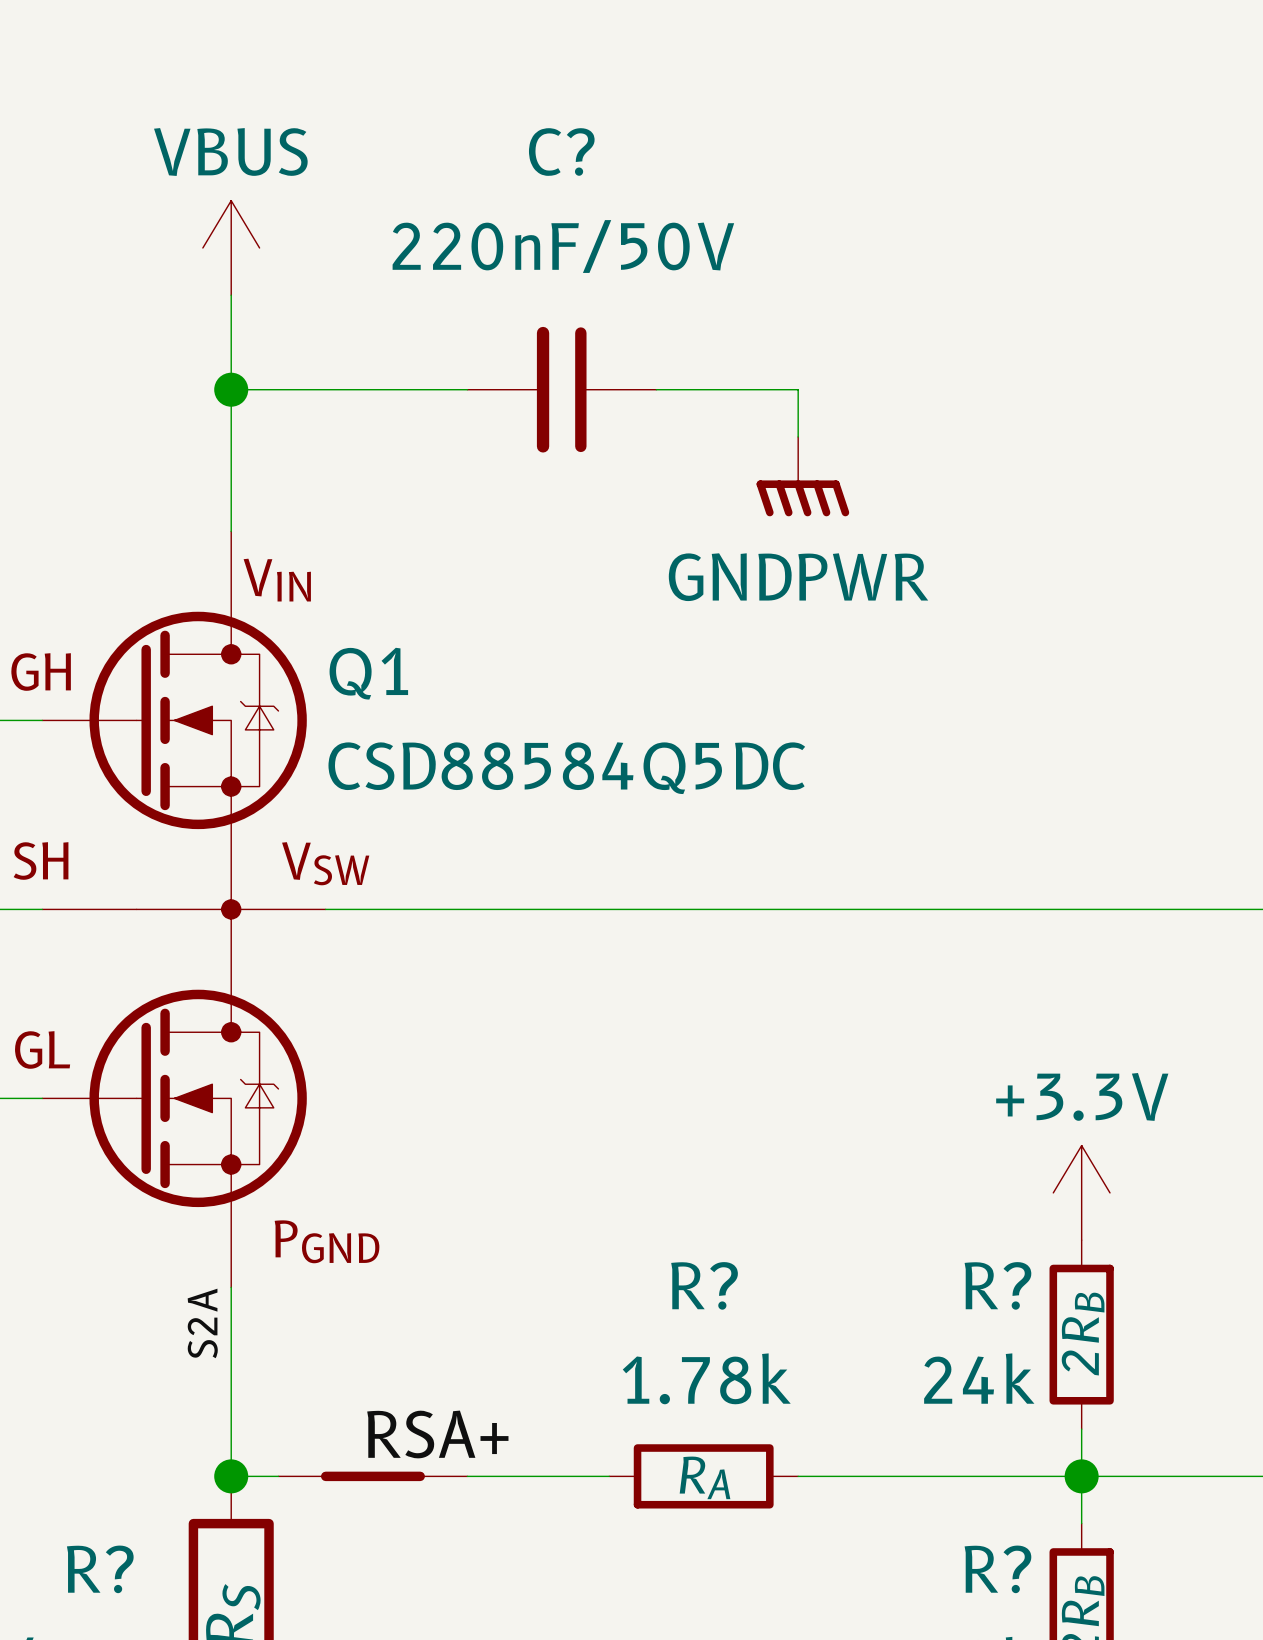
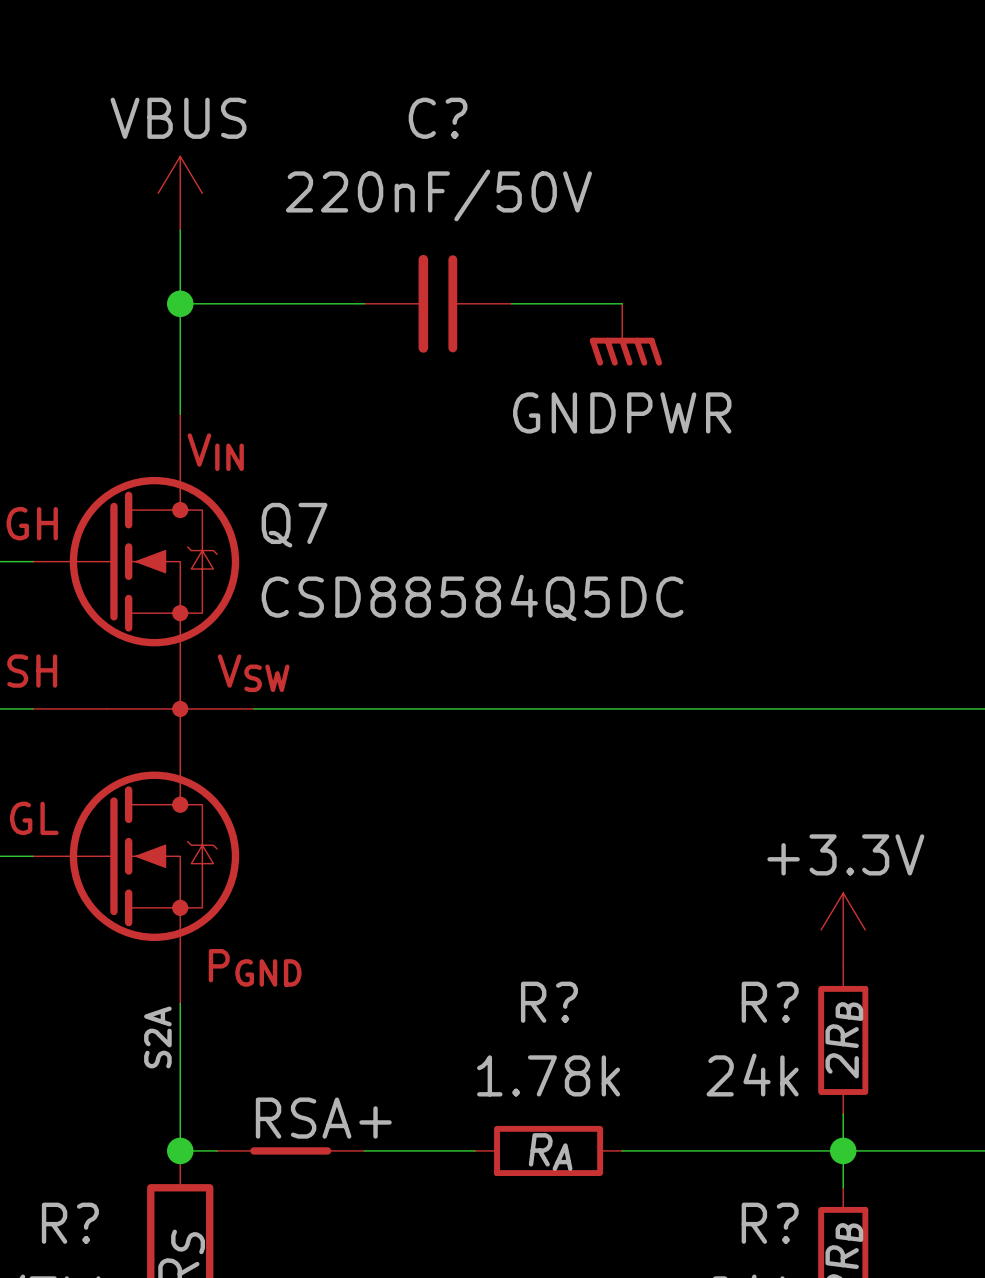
power symbol position: GNDPWR (802, 476) -> GNDPWR (625, 334)
Q1 name: Q1 (368, 673) -> Q7 (294, 525)

